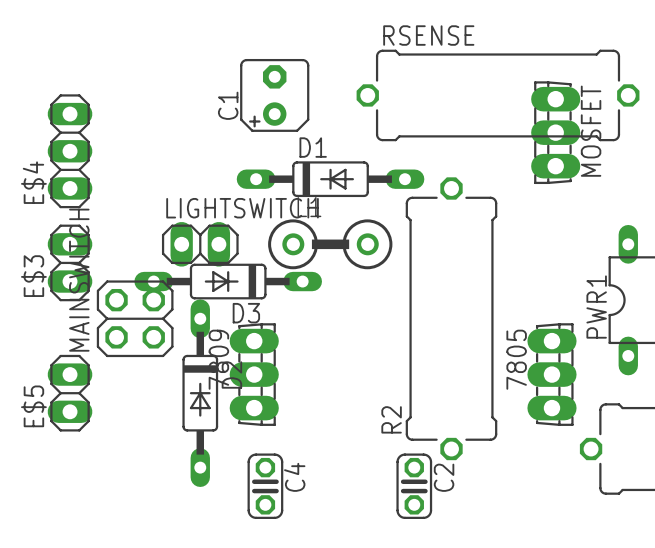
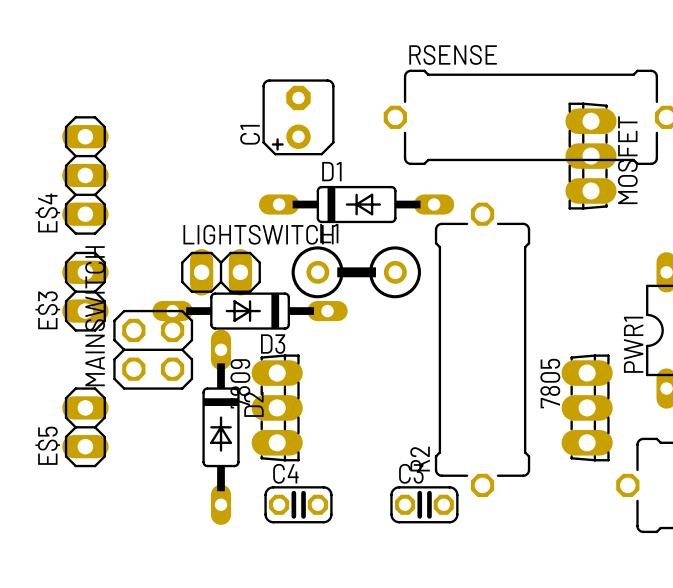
C3: none -> (424, 504)
C4 rotation: 0° (265, 486) -> 90° counterclockwise (298, 504)
C2: (414, 486) -> none

